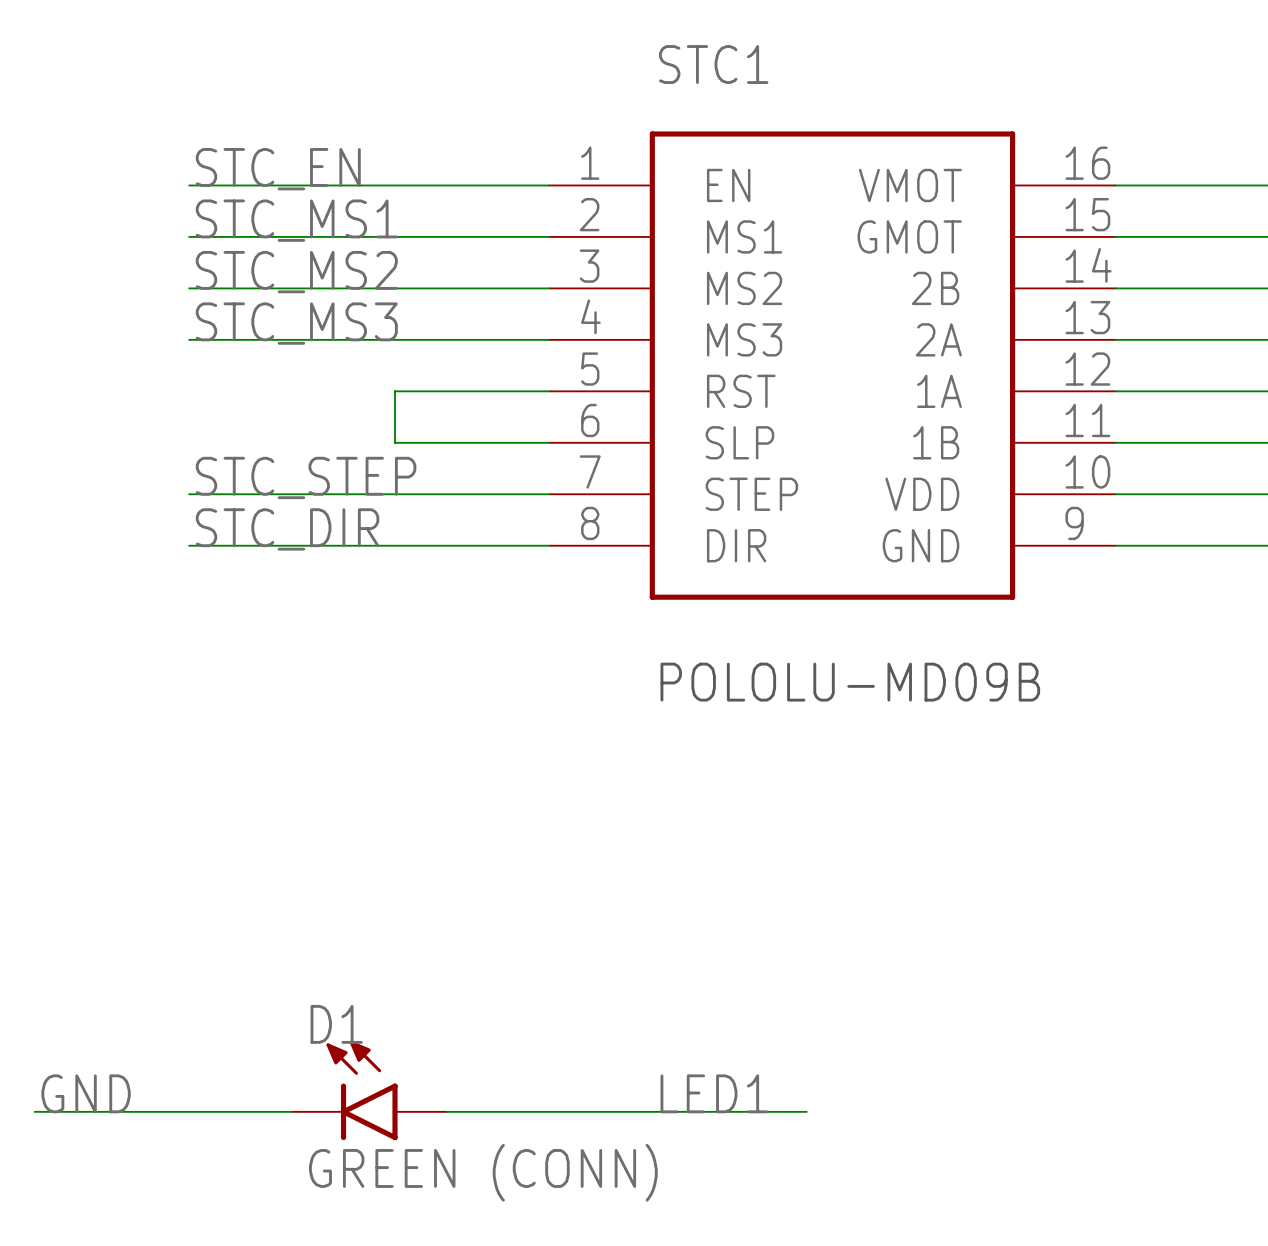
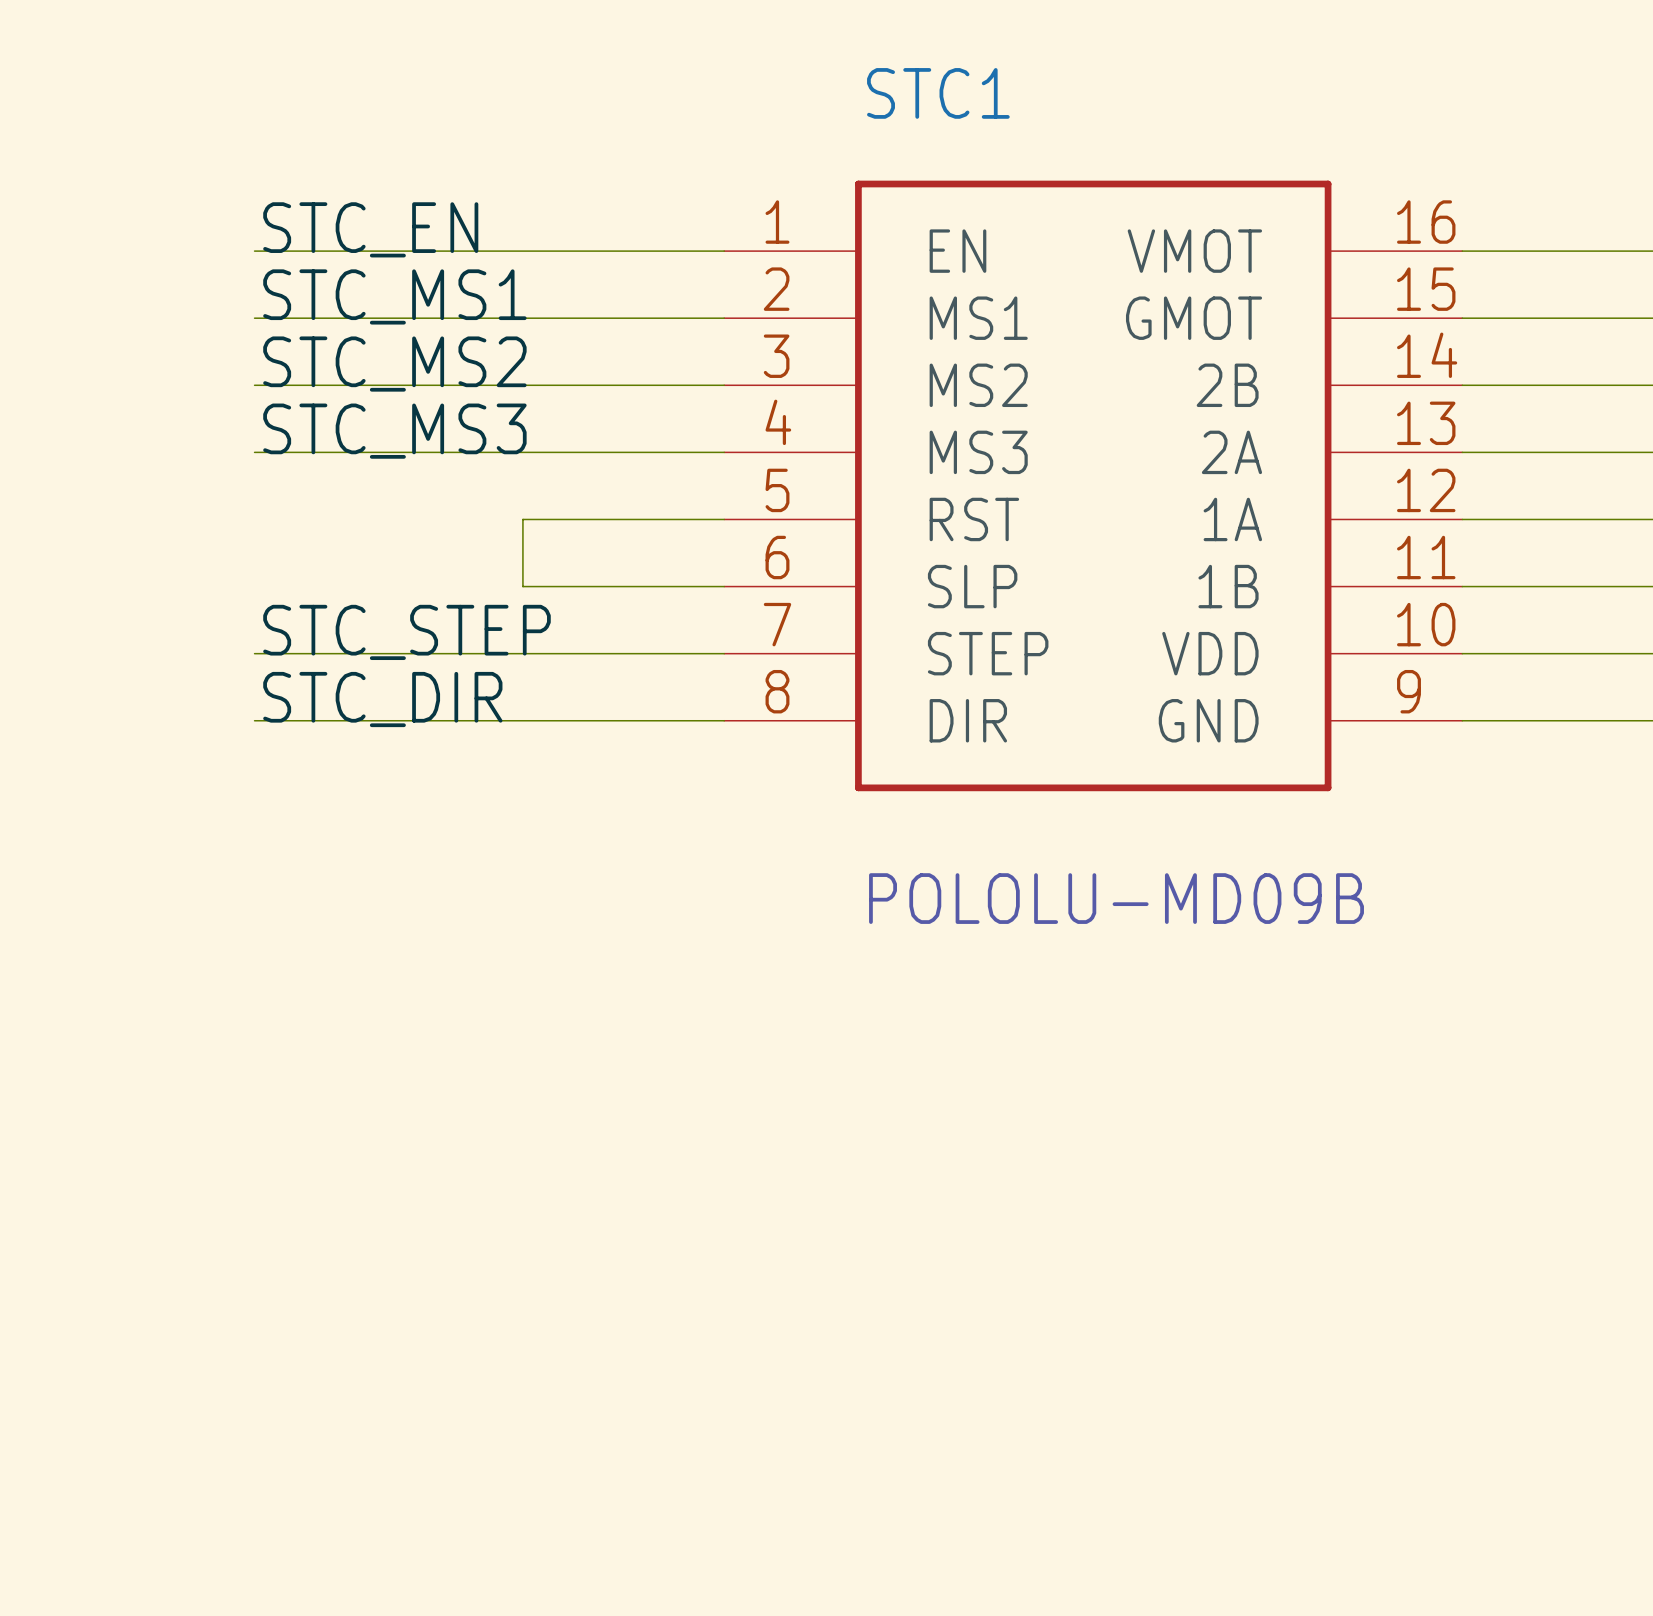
D1: GREEN (CONN) (369, 1090) -> none
label: GND (86, 1093) -> none
label: LED1 (714, 1093) -> none
wire: (34, 1111) (292, 1111) -> none
wire: (446, 1111) (806, 1111) -> none

